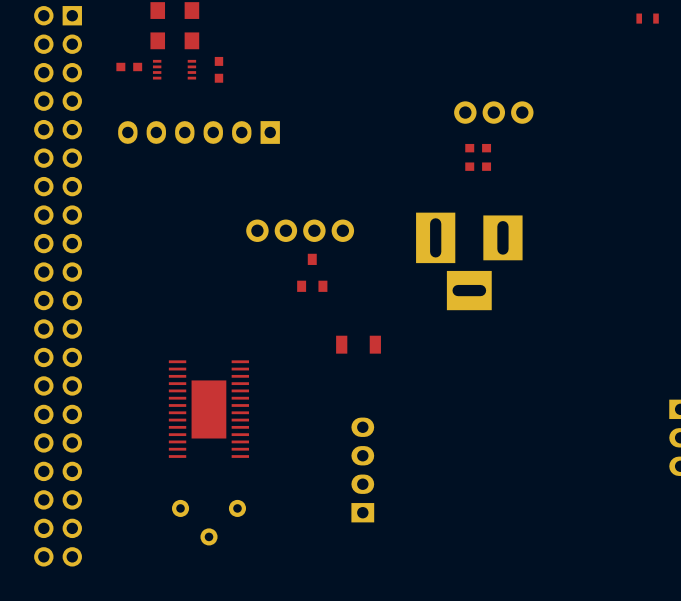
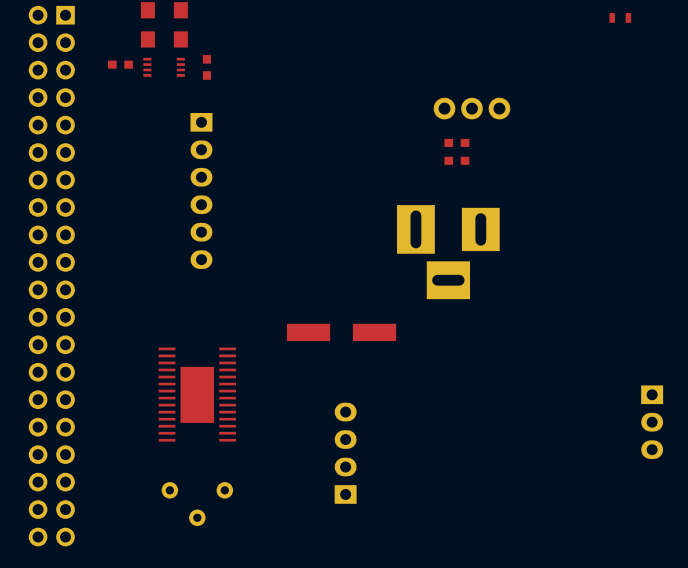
part rotation: 0° (199, 132) -> 90° counterclockwise (201, 190)
part: (300, 230) -> none
part: (312, 272) -> none
part footprint: [336, 335, 381, 354] -> [286, 323, 397, 342]

